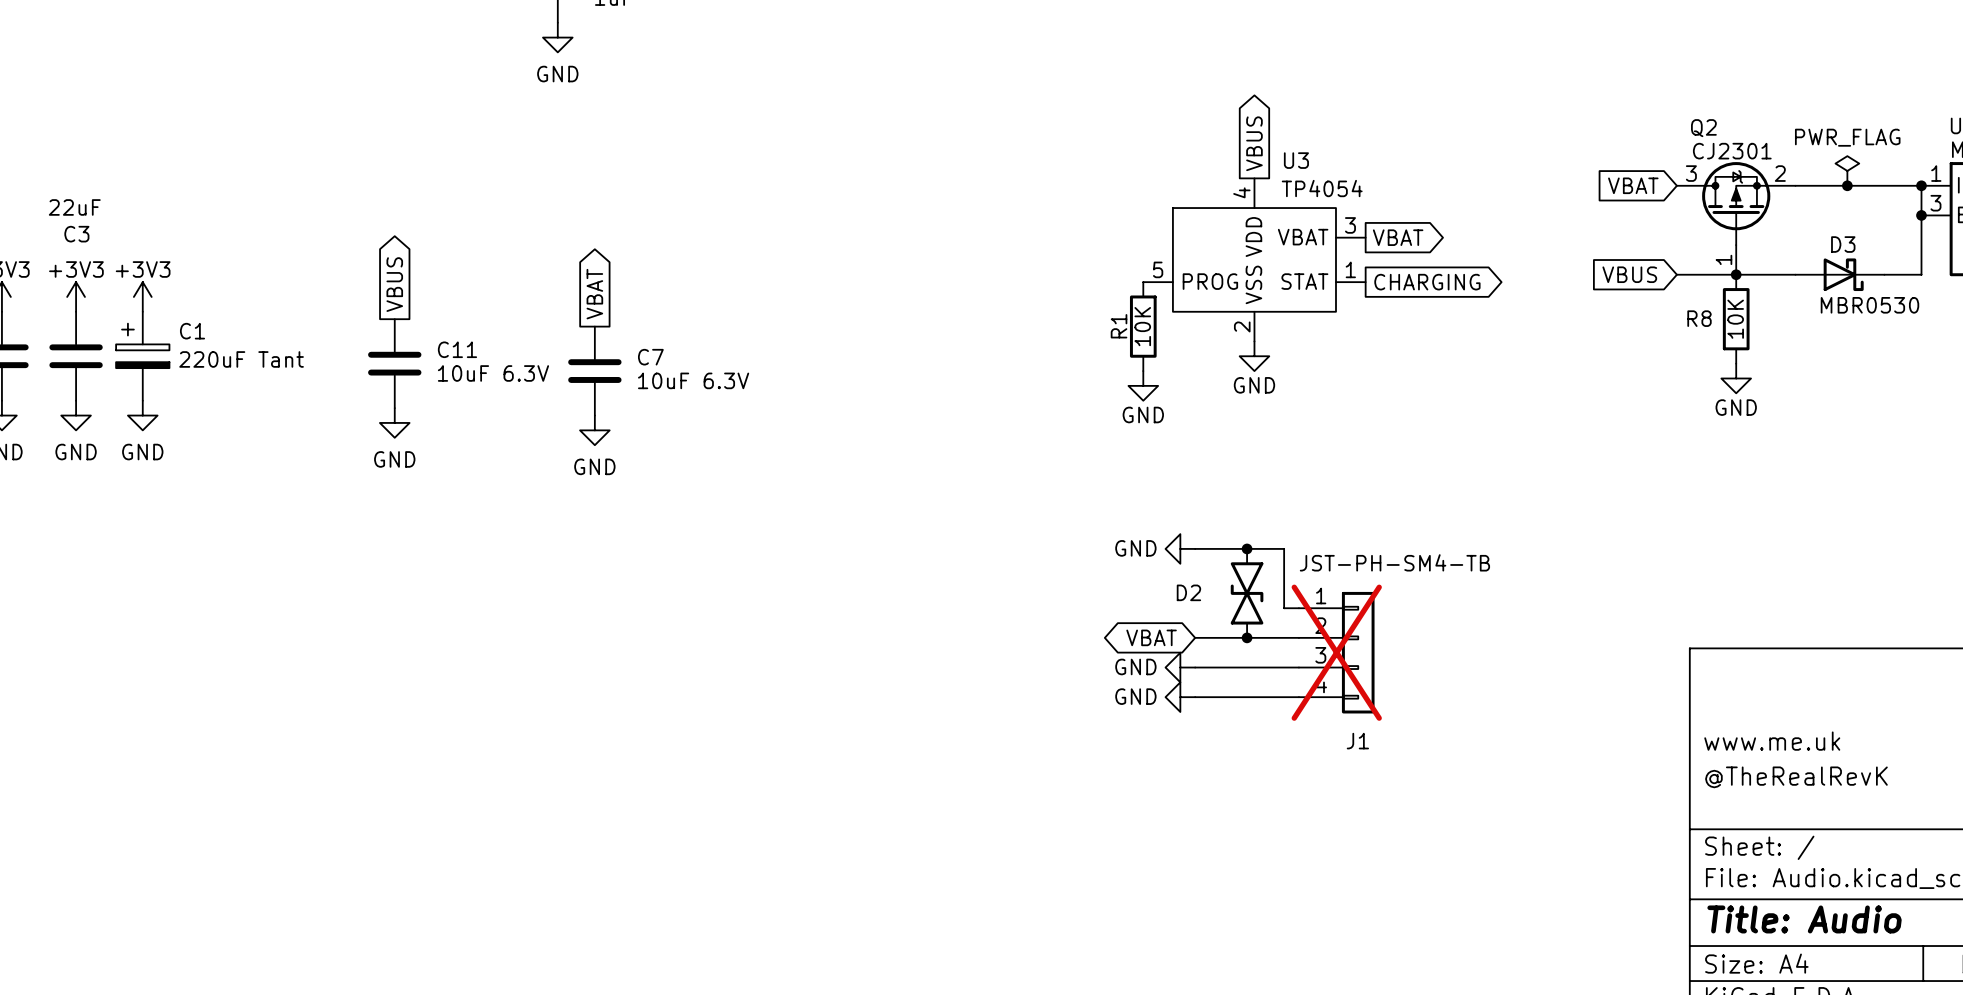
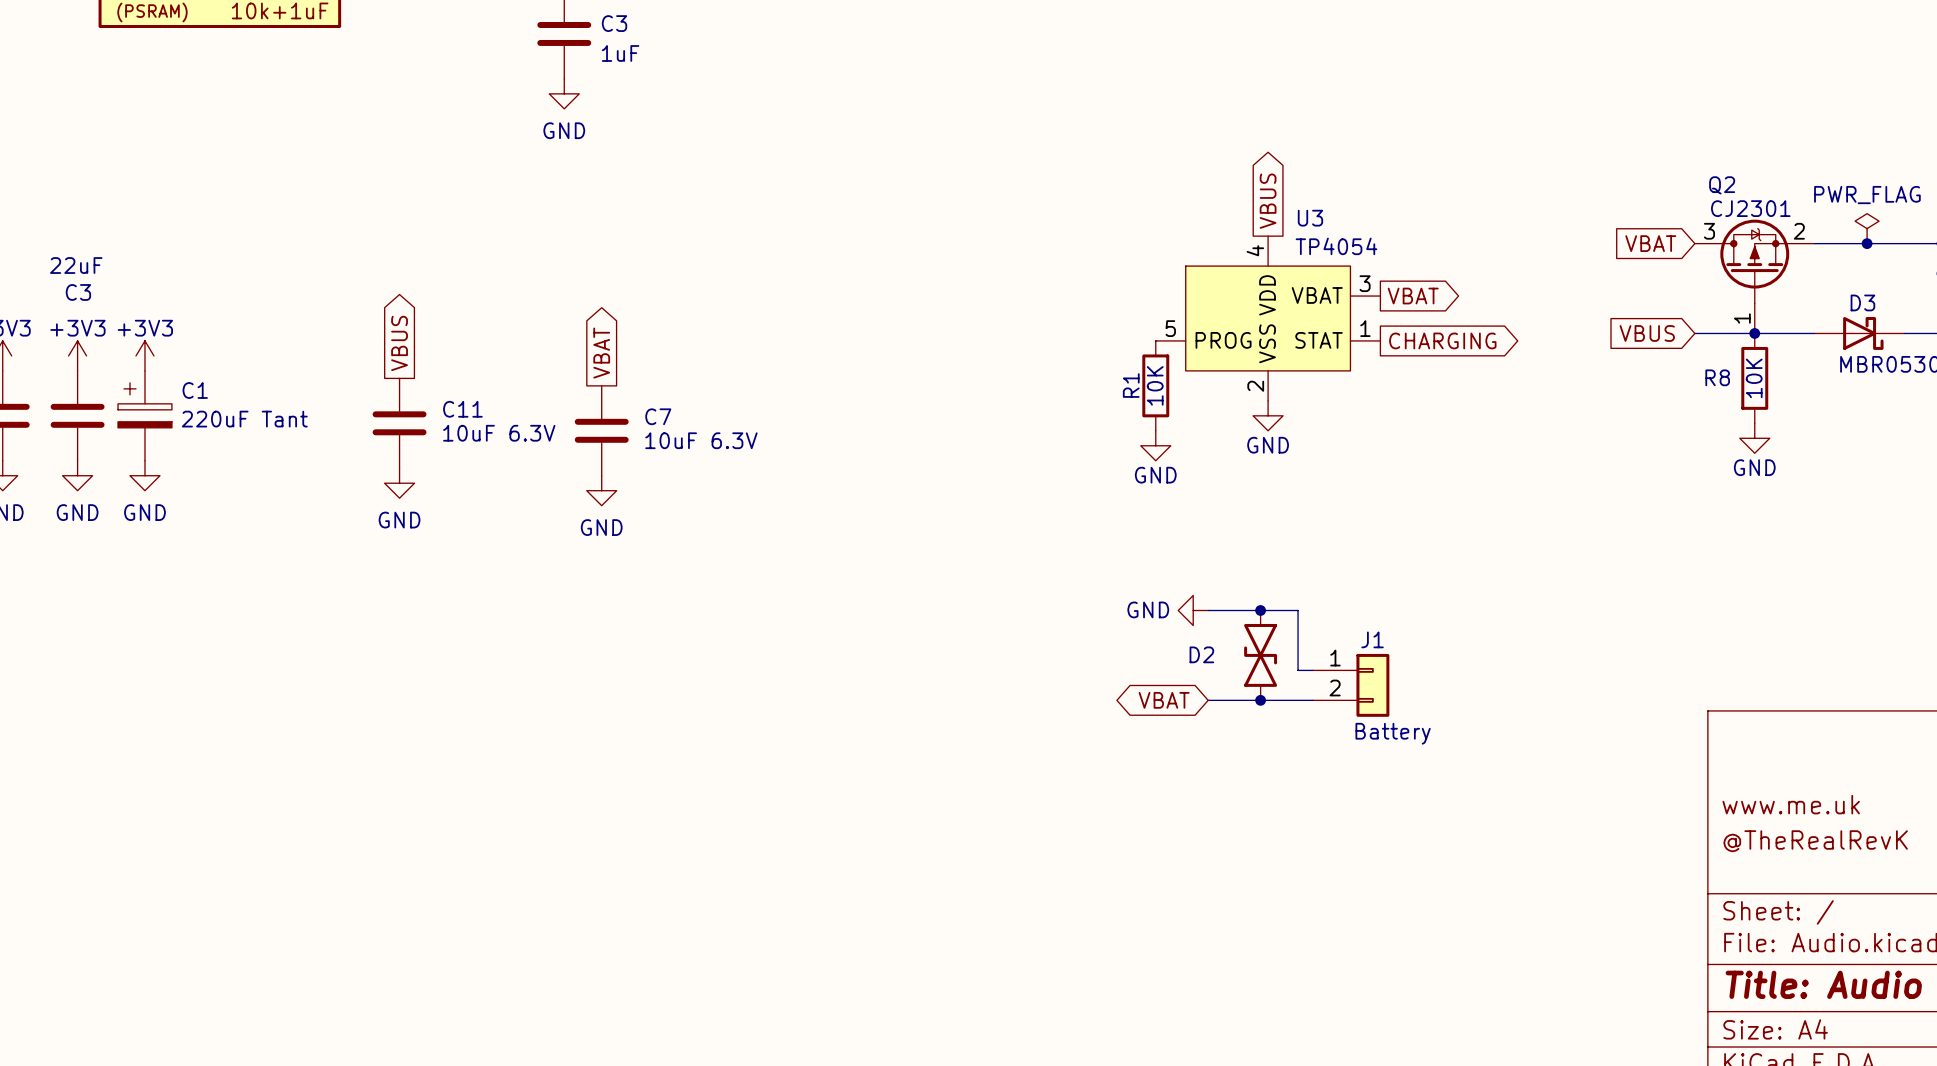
J1 value: JST-PH-SM4-TB (1394, 562) -> Battery (1393, 733)
J1 symbol: [1298, 591, 1375, 714] -> [1313, 653, 1390, 717]
J1 do-not-place cross: (1336, 652) -> none
power symbol: GND (1180, 667) -> none
wire: (1195, 667) (1298, 667) -> none
power symbol: GND (1180, 697) -> none
wire: (1195, 697) (1298, 697) -> none
J1 name position: J1 (1357, 741) -> J1 (1372, 639)

